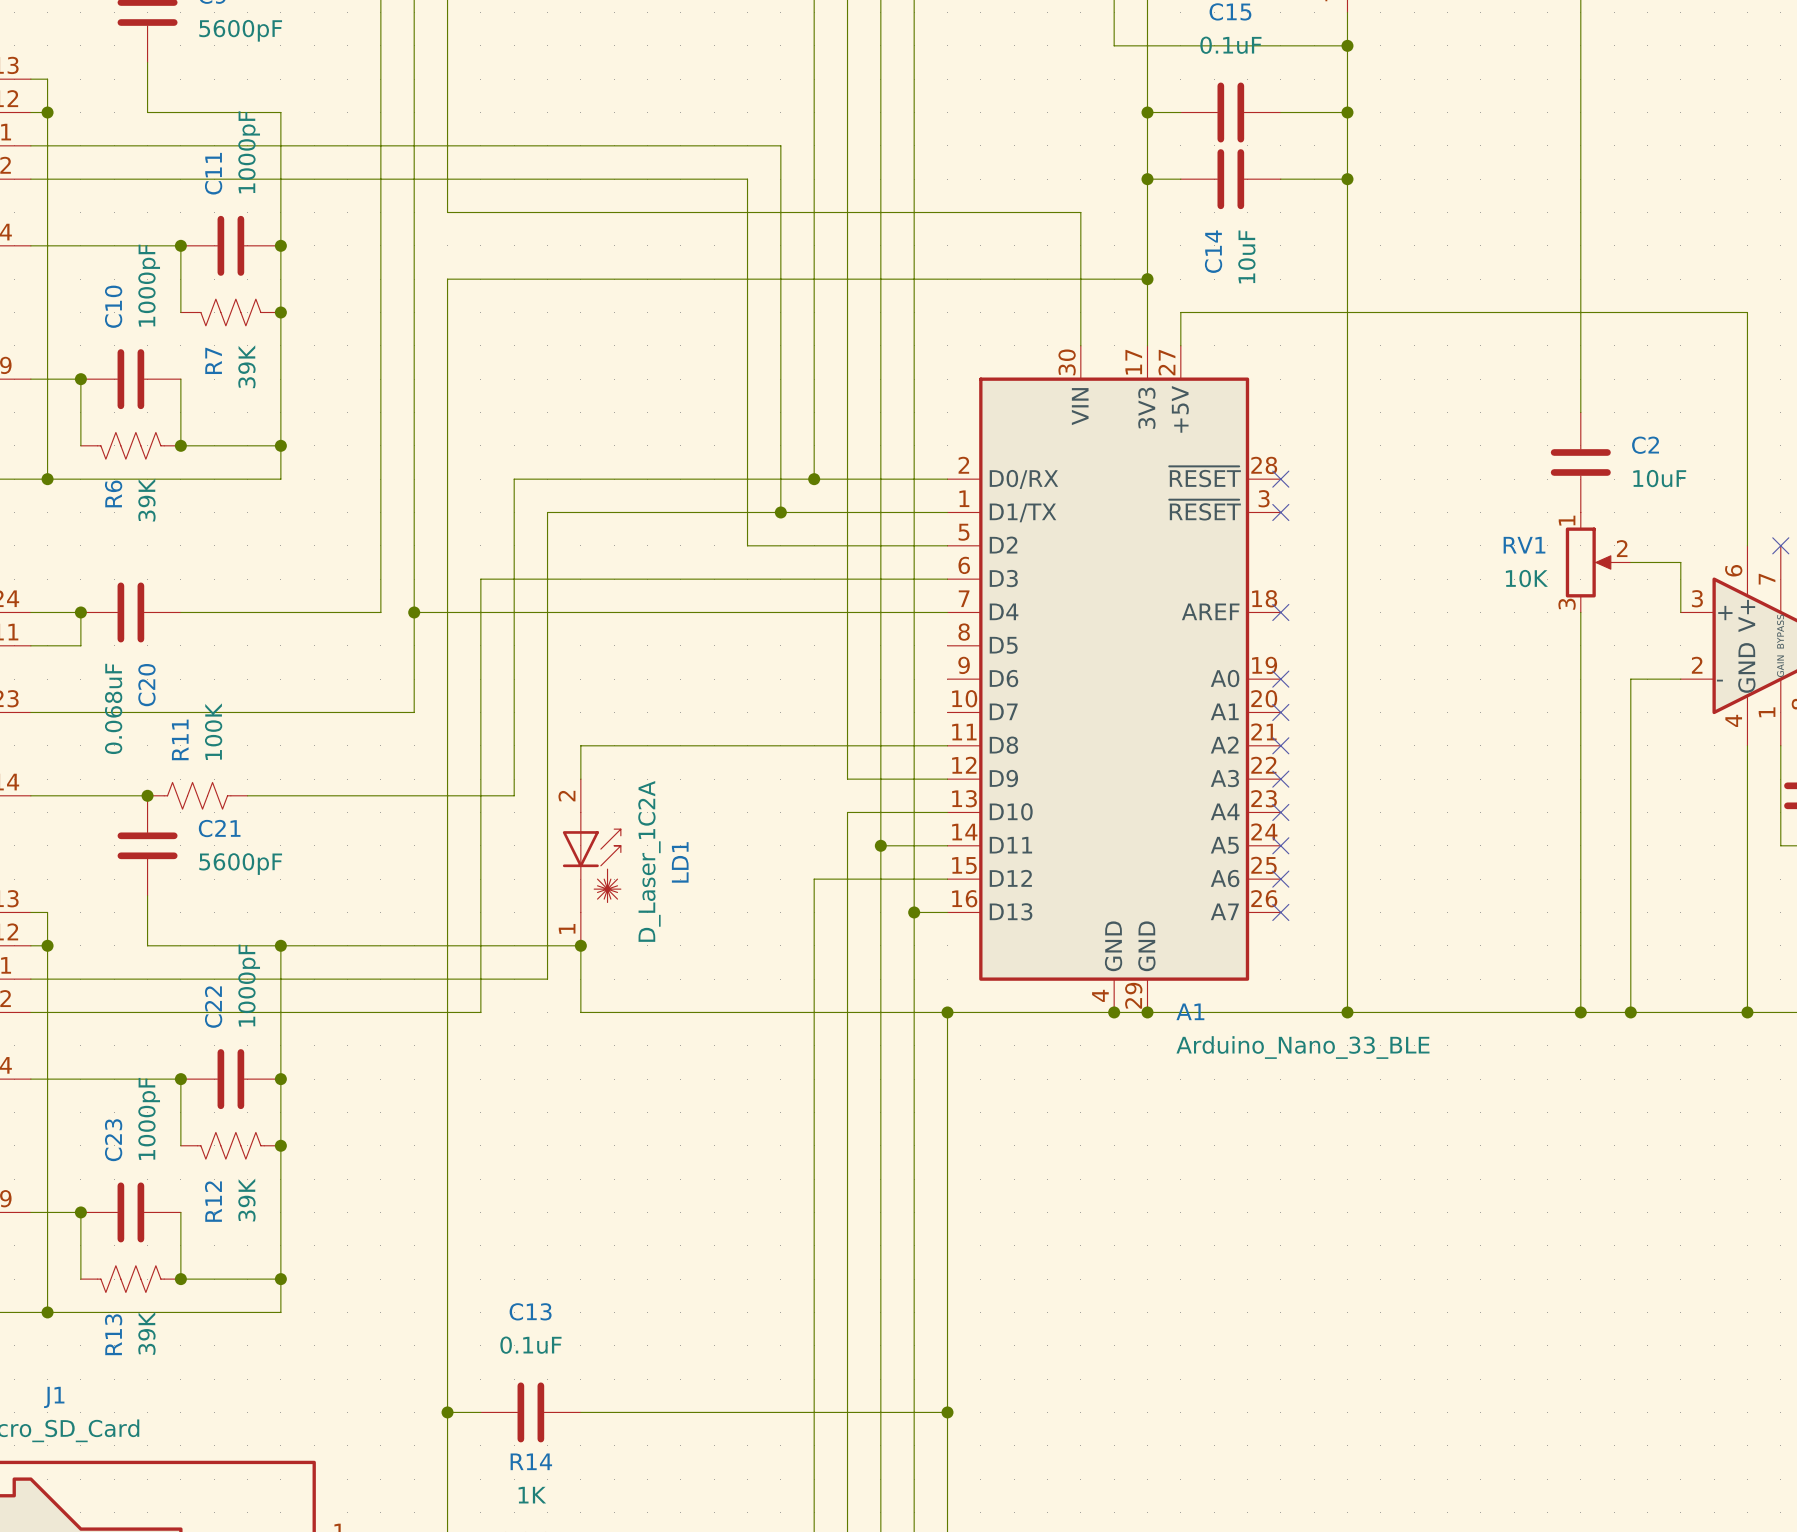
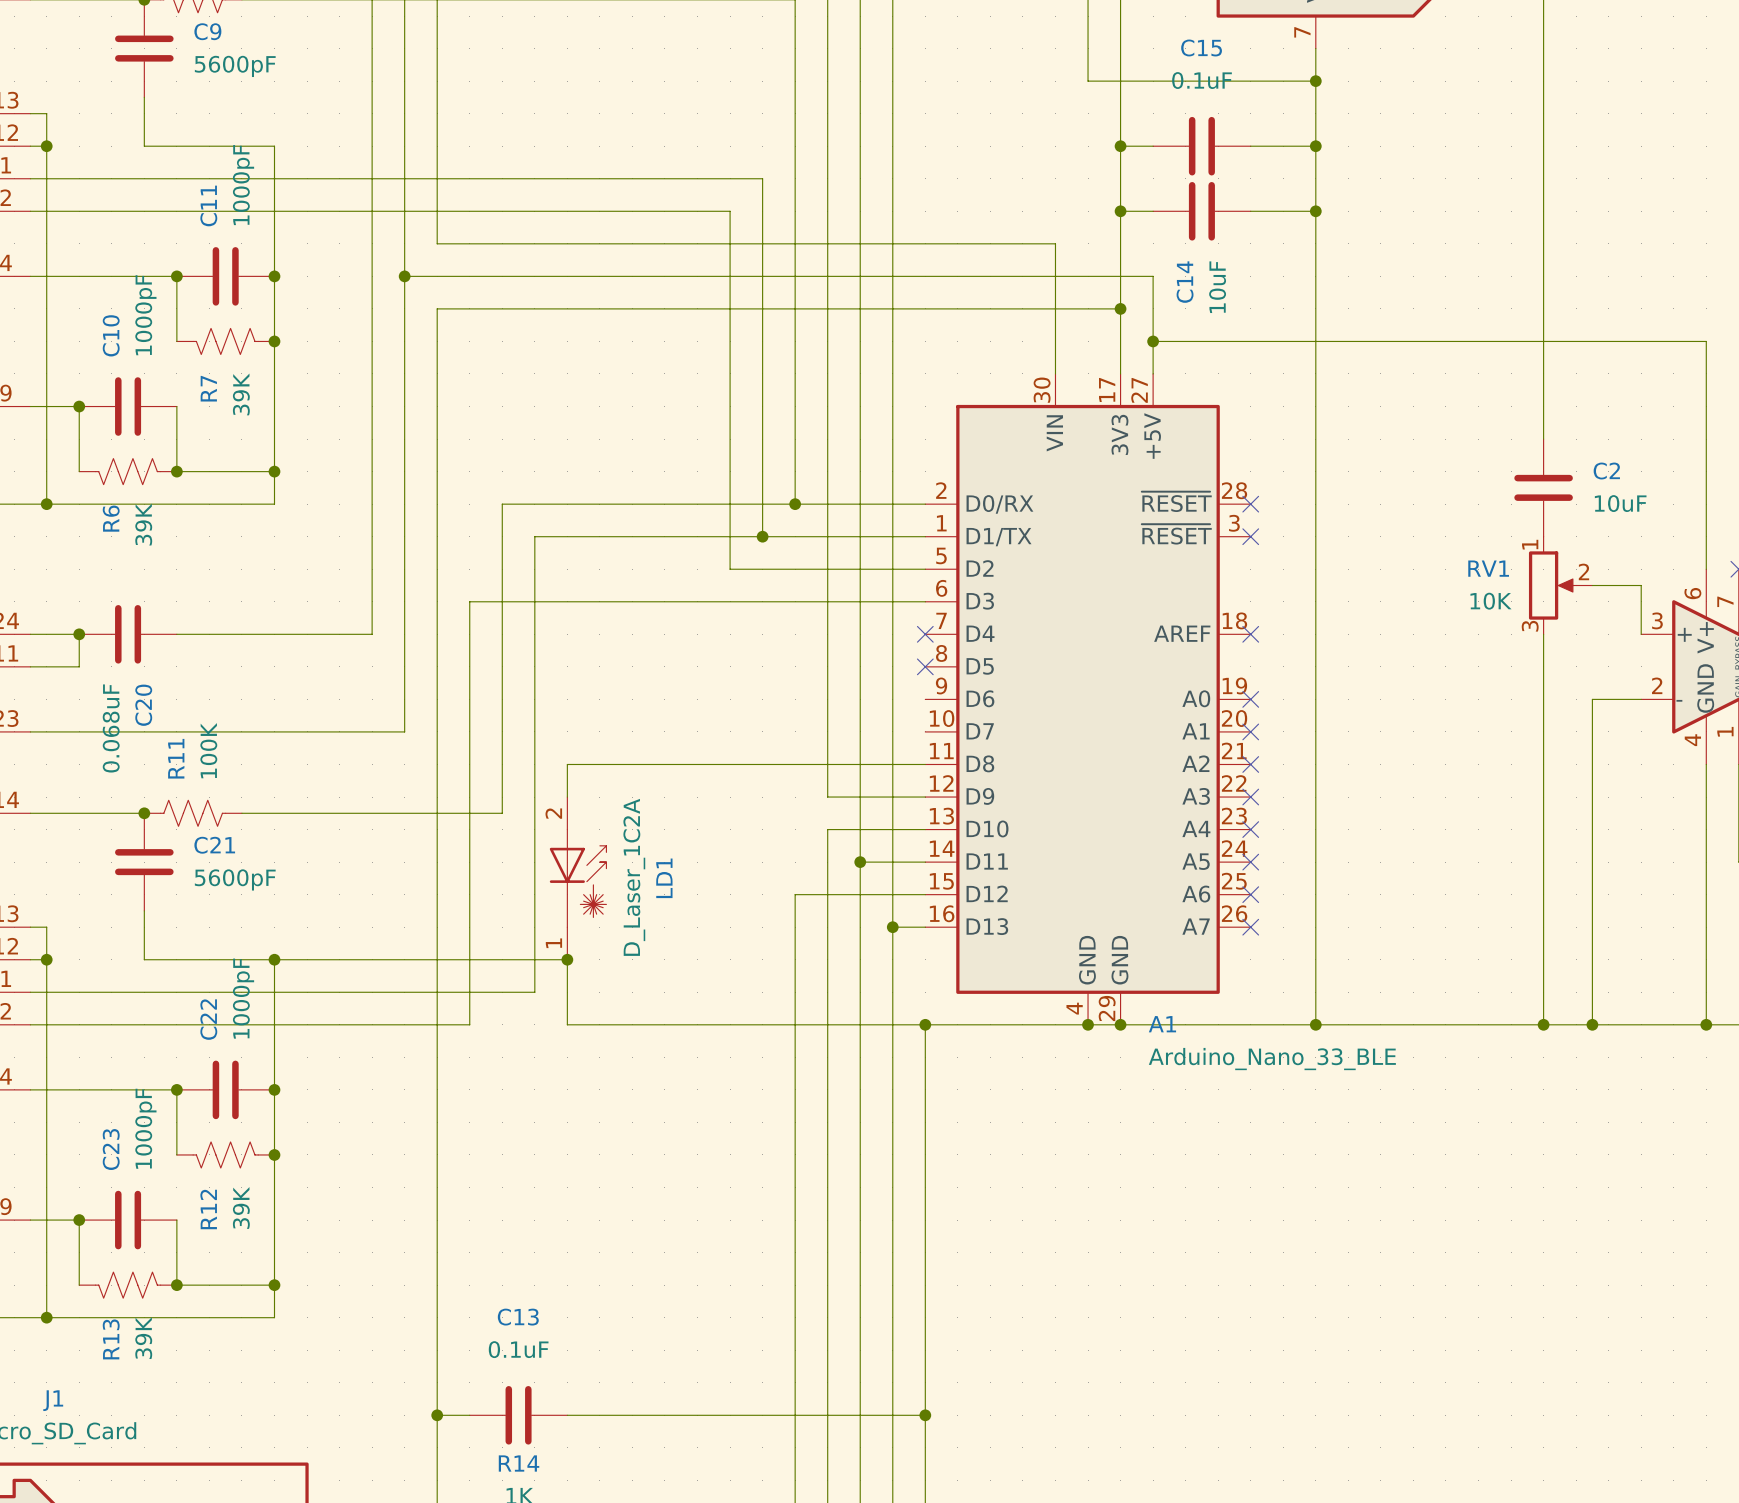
wire: none -> (404, 276) (1153, 276) (1153, 341)
junction: none -> (404, 276)
junction: none -> (1153, 341)
wire: (414, 612) (947, 612) -> none
junction: (414, 612) -> none
no-connect mark: none -> (925, 634)
no-connect mark: none -> (925, 666)

